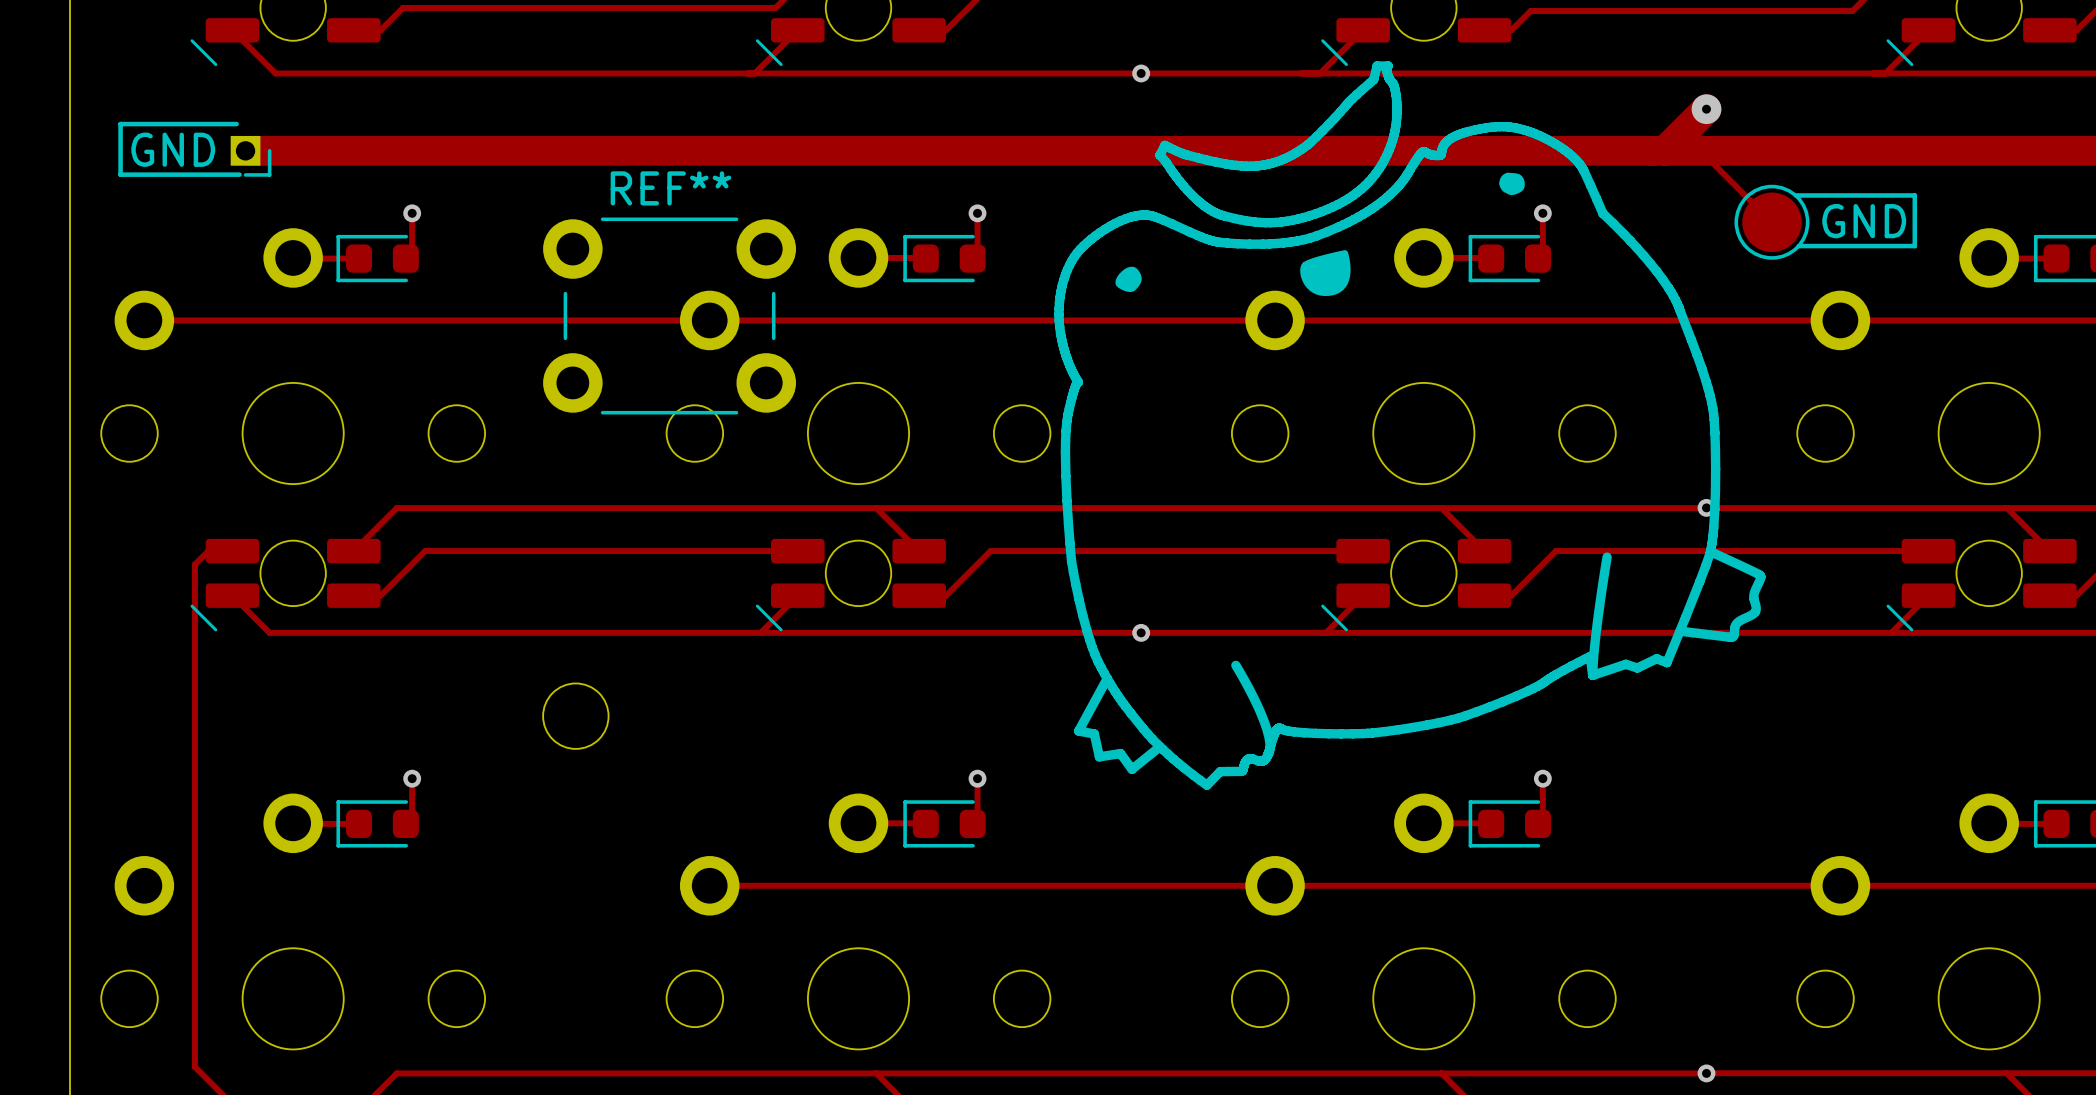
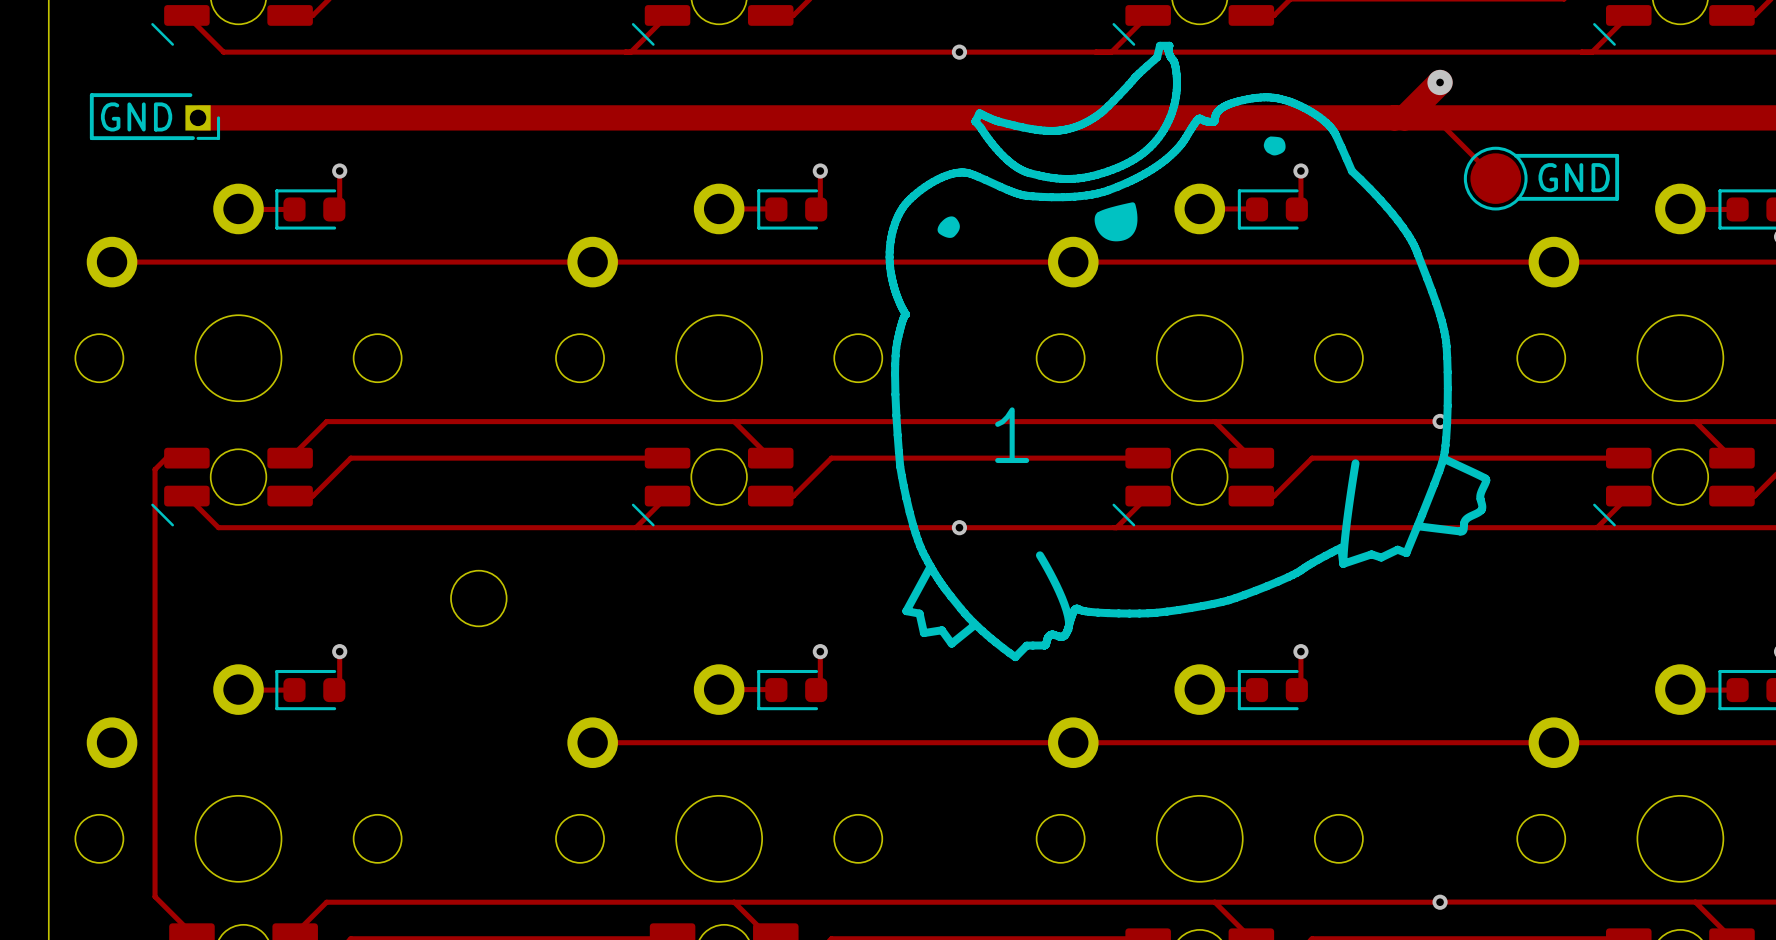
REF**: (669, 315) -> none
text: none -> 1 (1012, 435)

